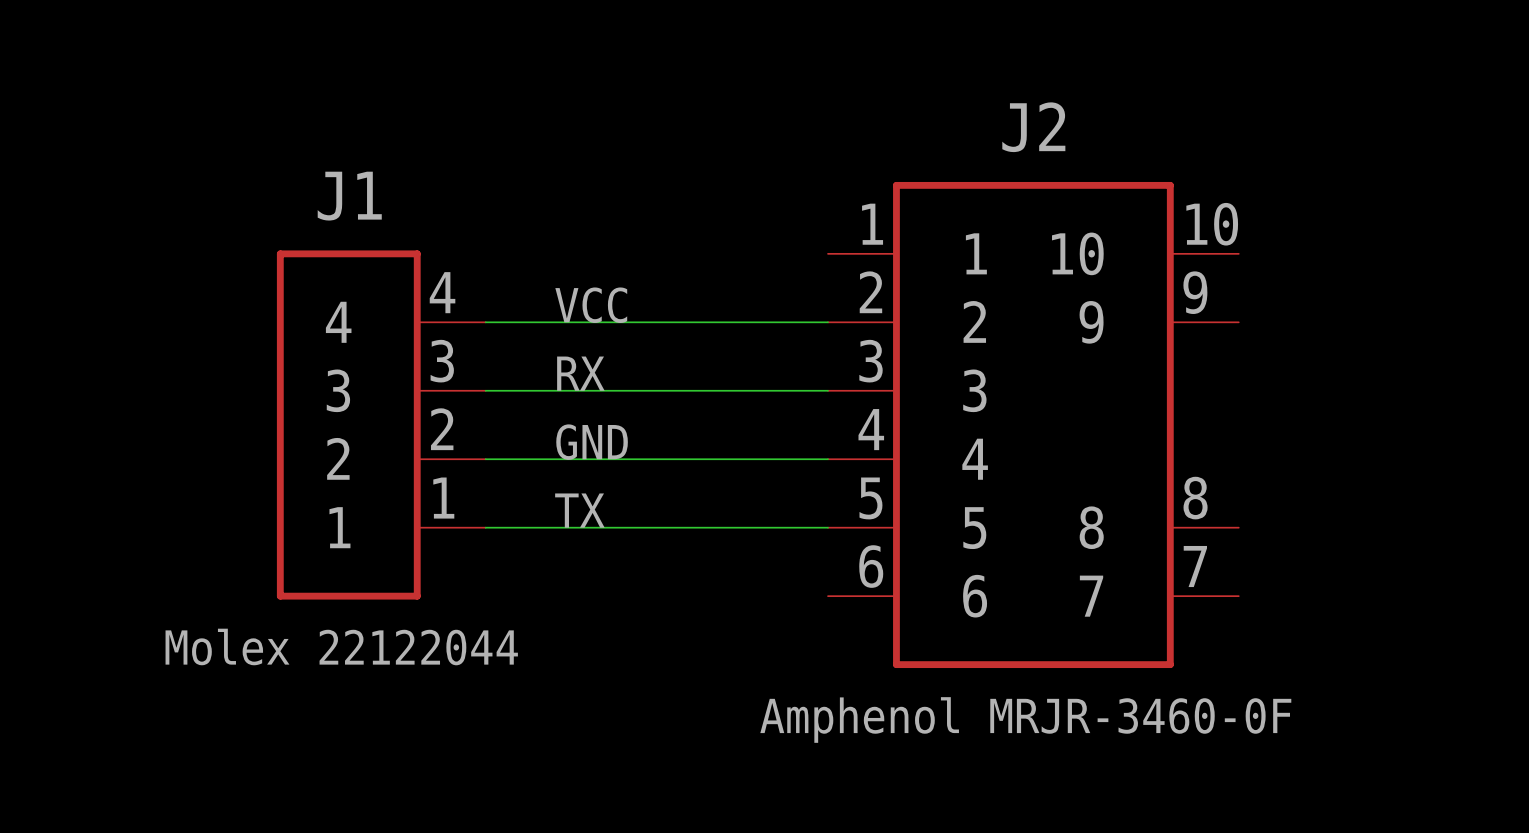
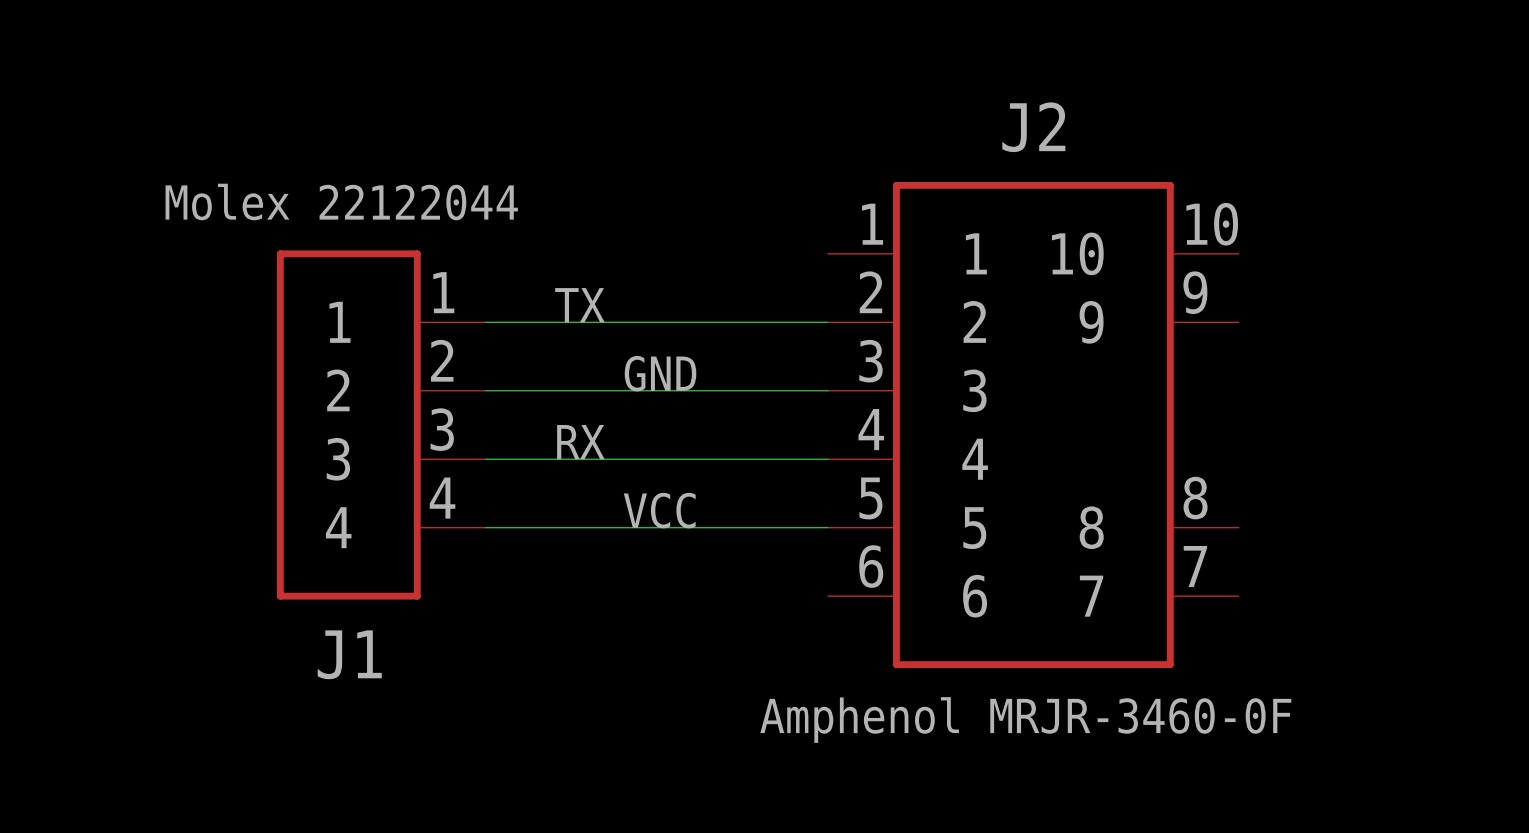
label: VCC (591, 305) -> TX (579, 305)
label: RX (580, 373) -> none
label: none -> GND (660, 373)
J1 flip: as is (348, 425) -> up-down (348, 425)
label: GND (592, 442) -> RX (580, 442)
label: TX (579, 510) -> none
label: none -> VCC (659, 510)

